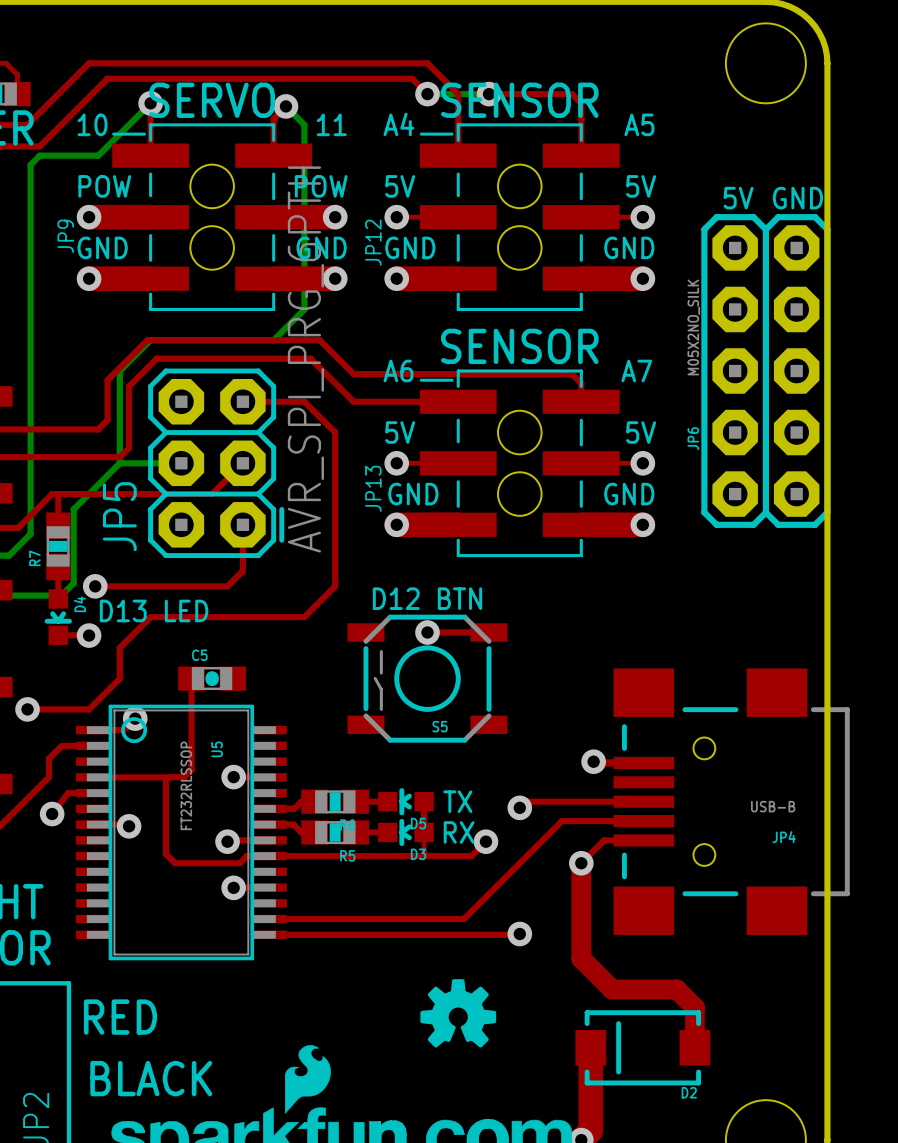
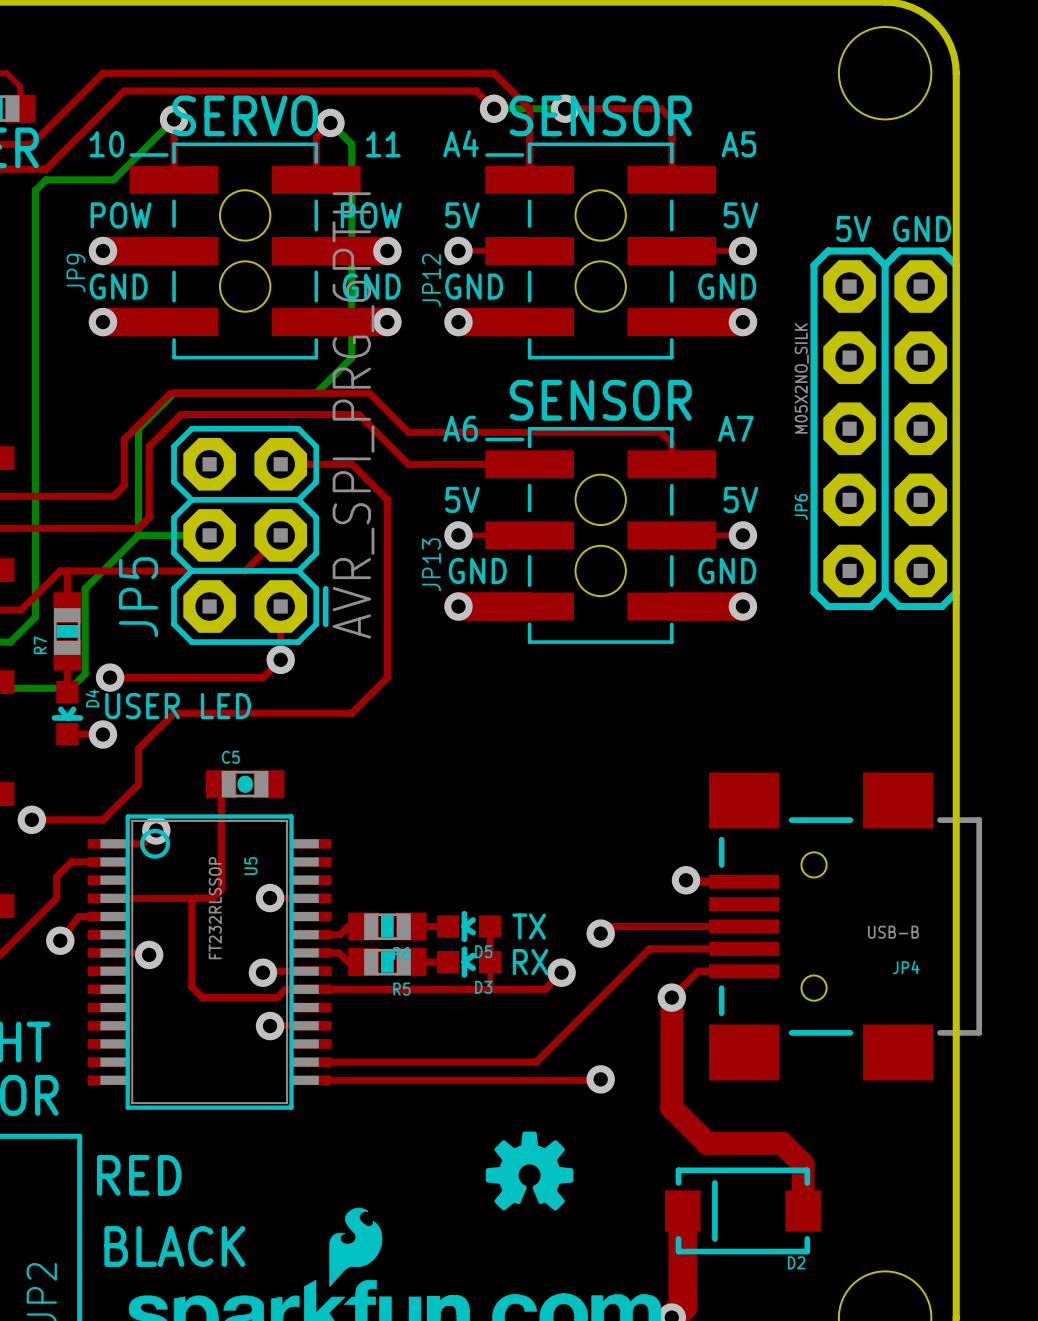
via: none -> (280, 659)
text: D12 BTN (427, 598) -> none
text: D13 LED (154, 610) -> USER LED (178, 706)
top track: (427, 632) (489, 632) -> none
via: (427, 632) -> none
S5: (427, 678) -> none

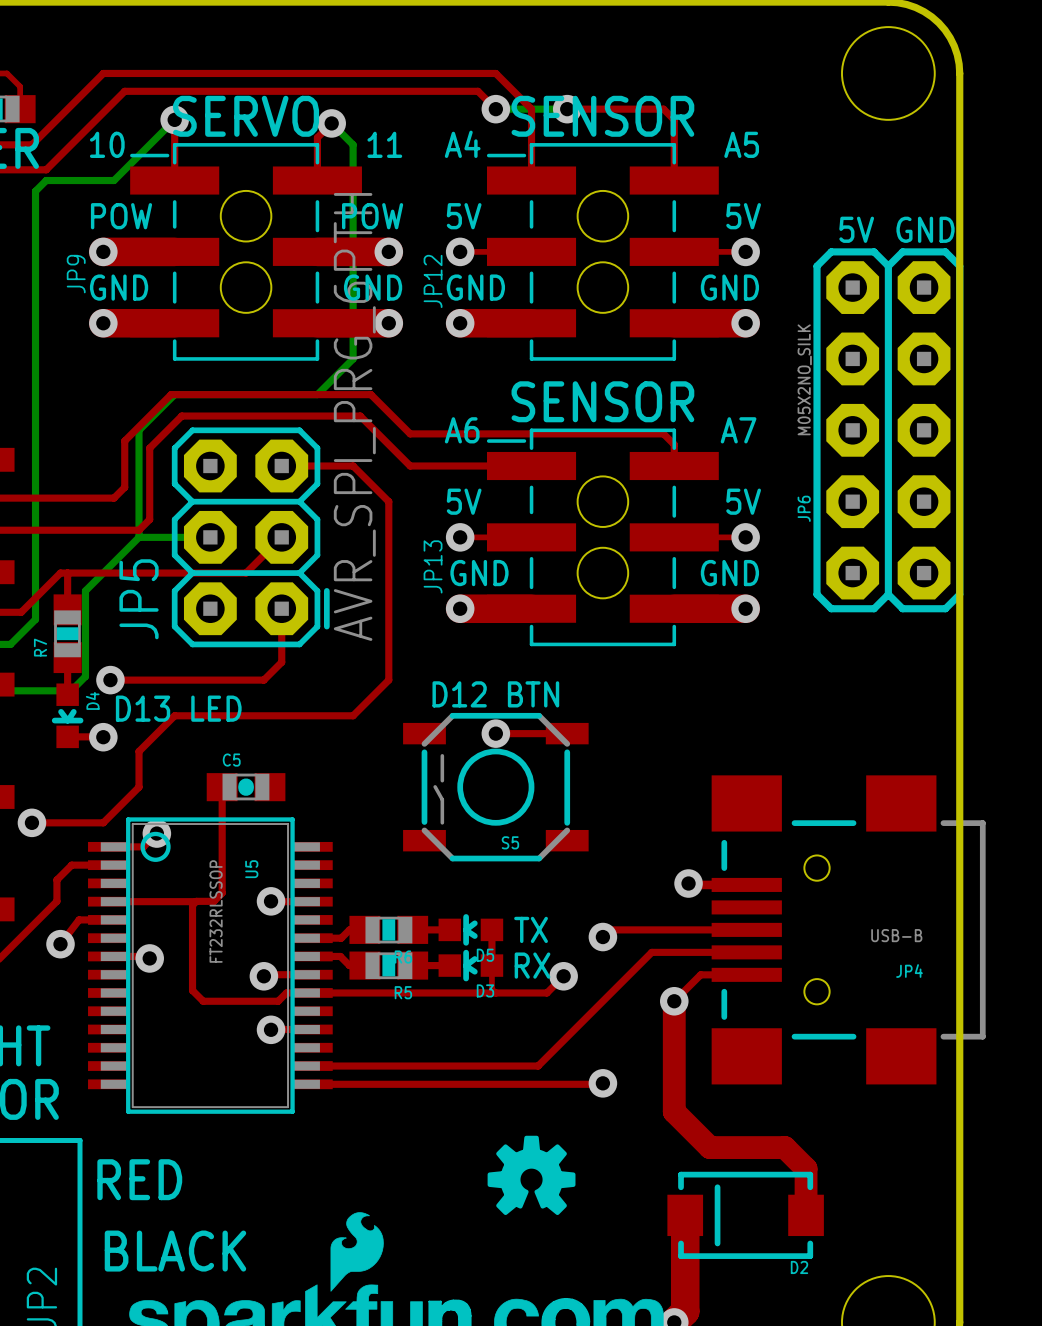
via: (280, 659) -> none
text: none -> D12 BTN (495, 694)
text: USER LED (178, 706) -> D13 LED (178, 708)
top track: none -> (495, 733) (567, 733)
via: none -> (495, 733)
S5: none -> (495, 787)

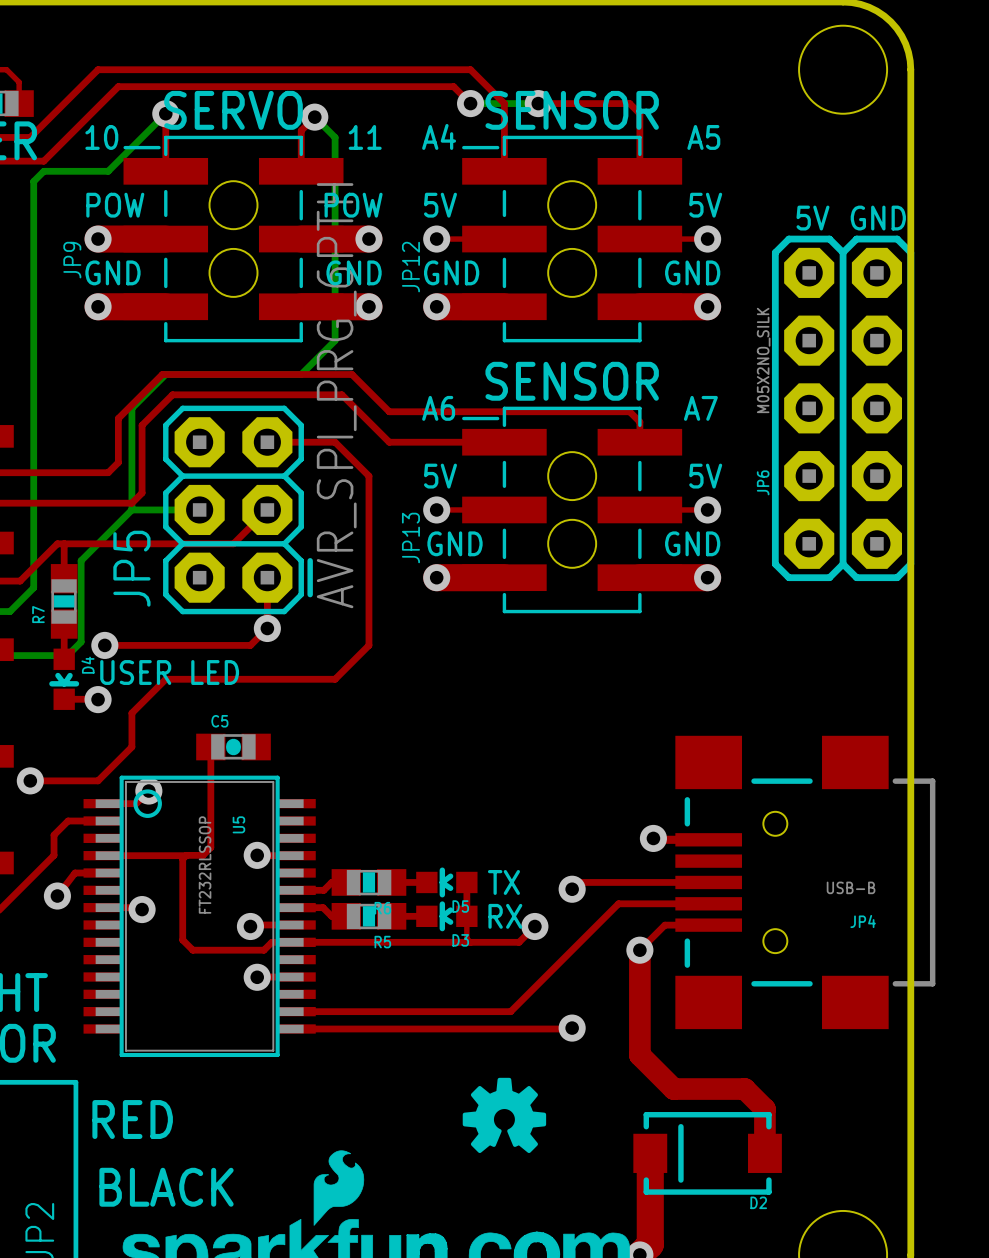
via: none -> (267, 628)
text: D12 BTN (495, 694) -> none
text: D13 LED (178, 708) -> USER LED (169, 672)
top track: (495, 733) (567, 733) -> none
via: (495, 733) -> none
S5: (495, 787) -> none

